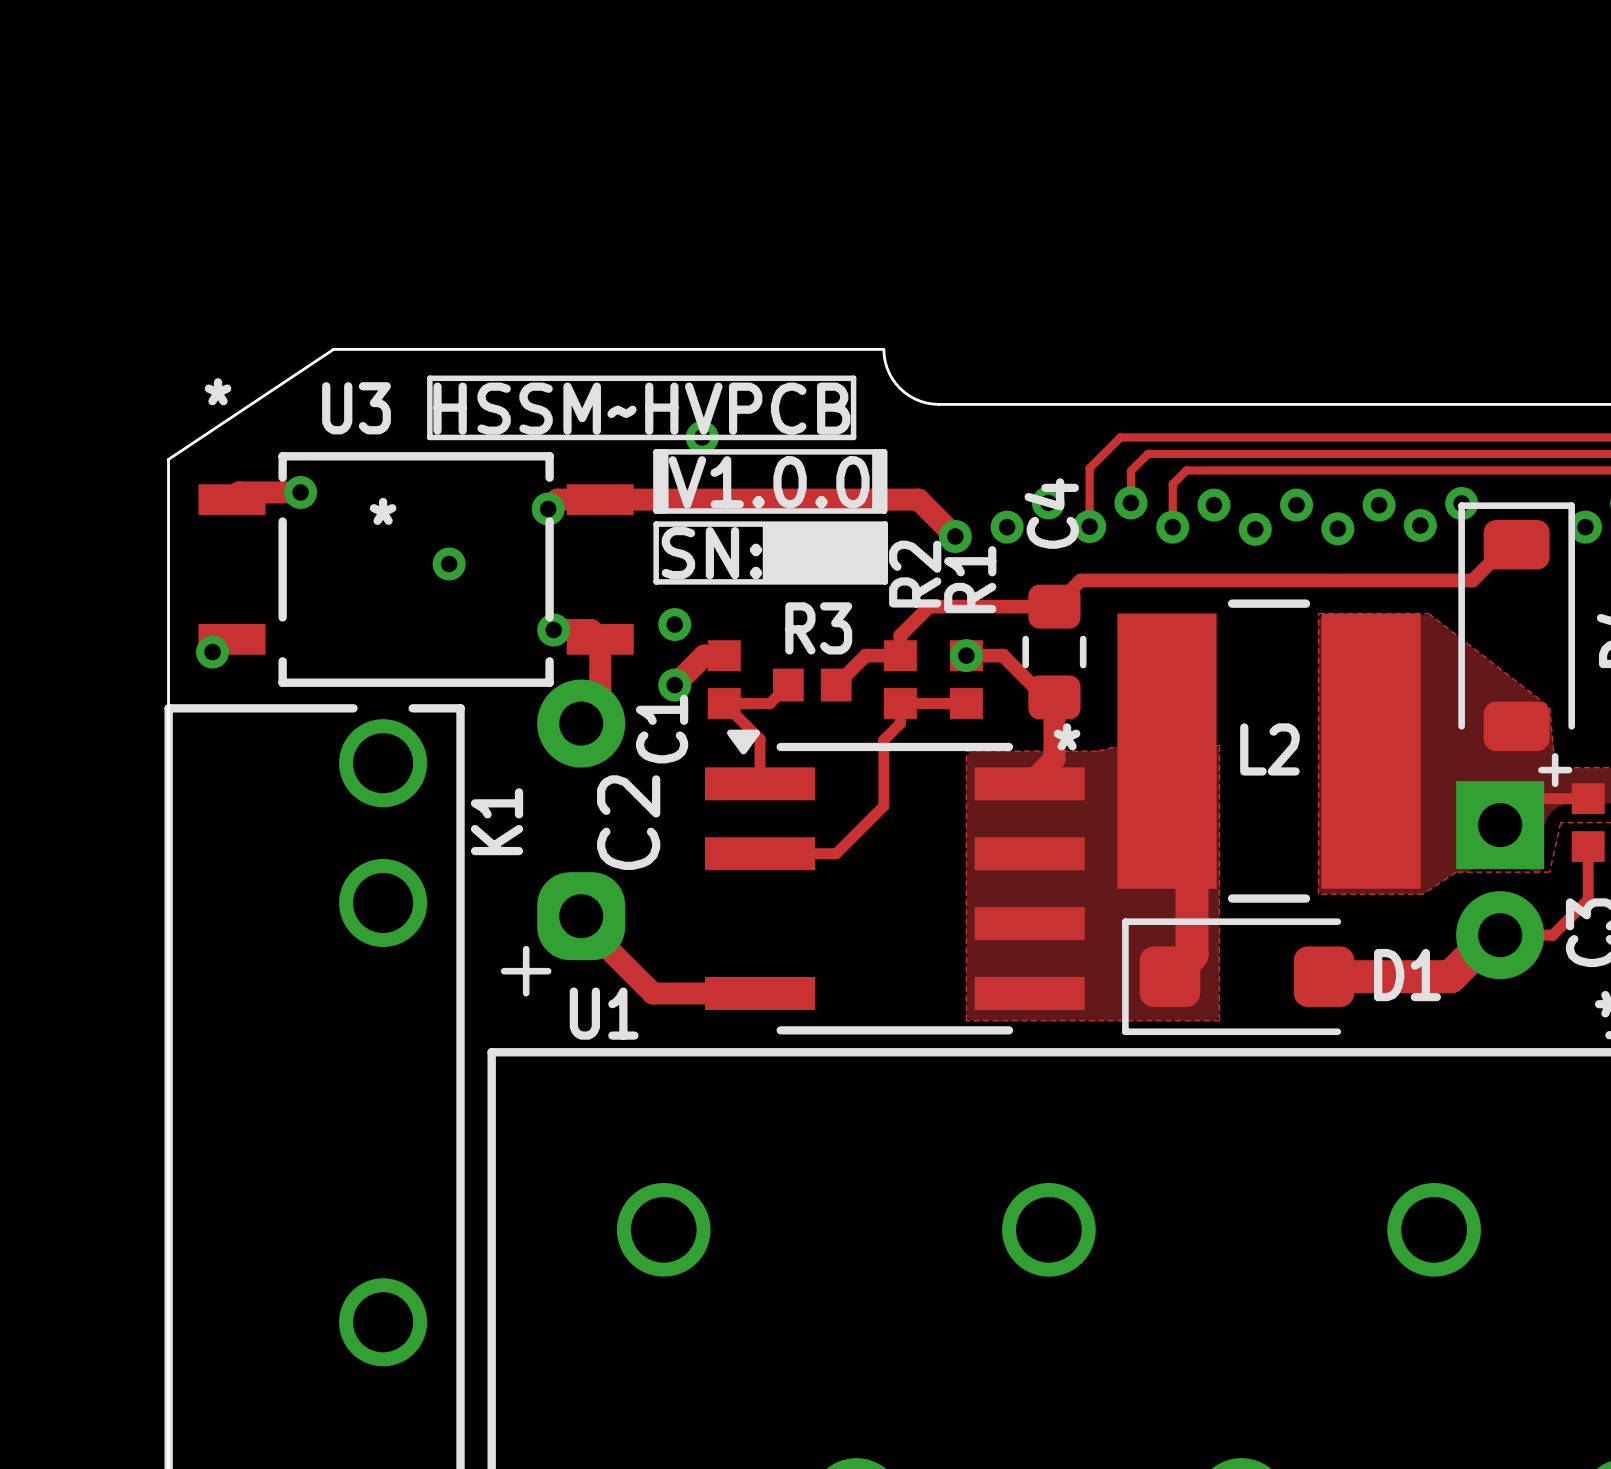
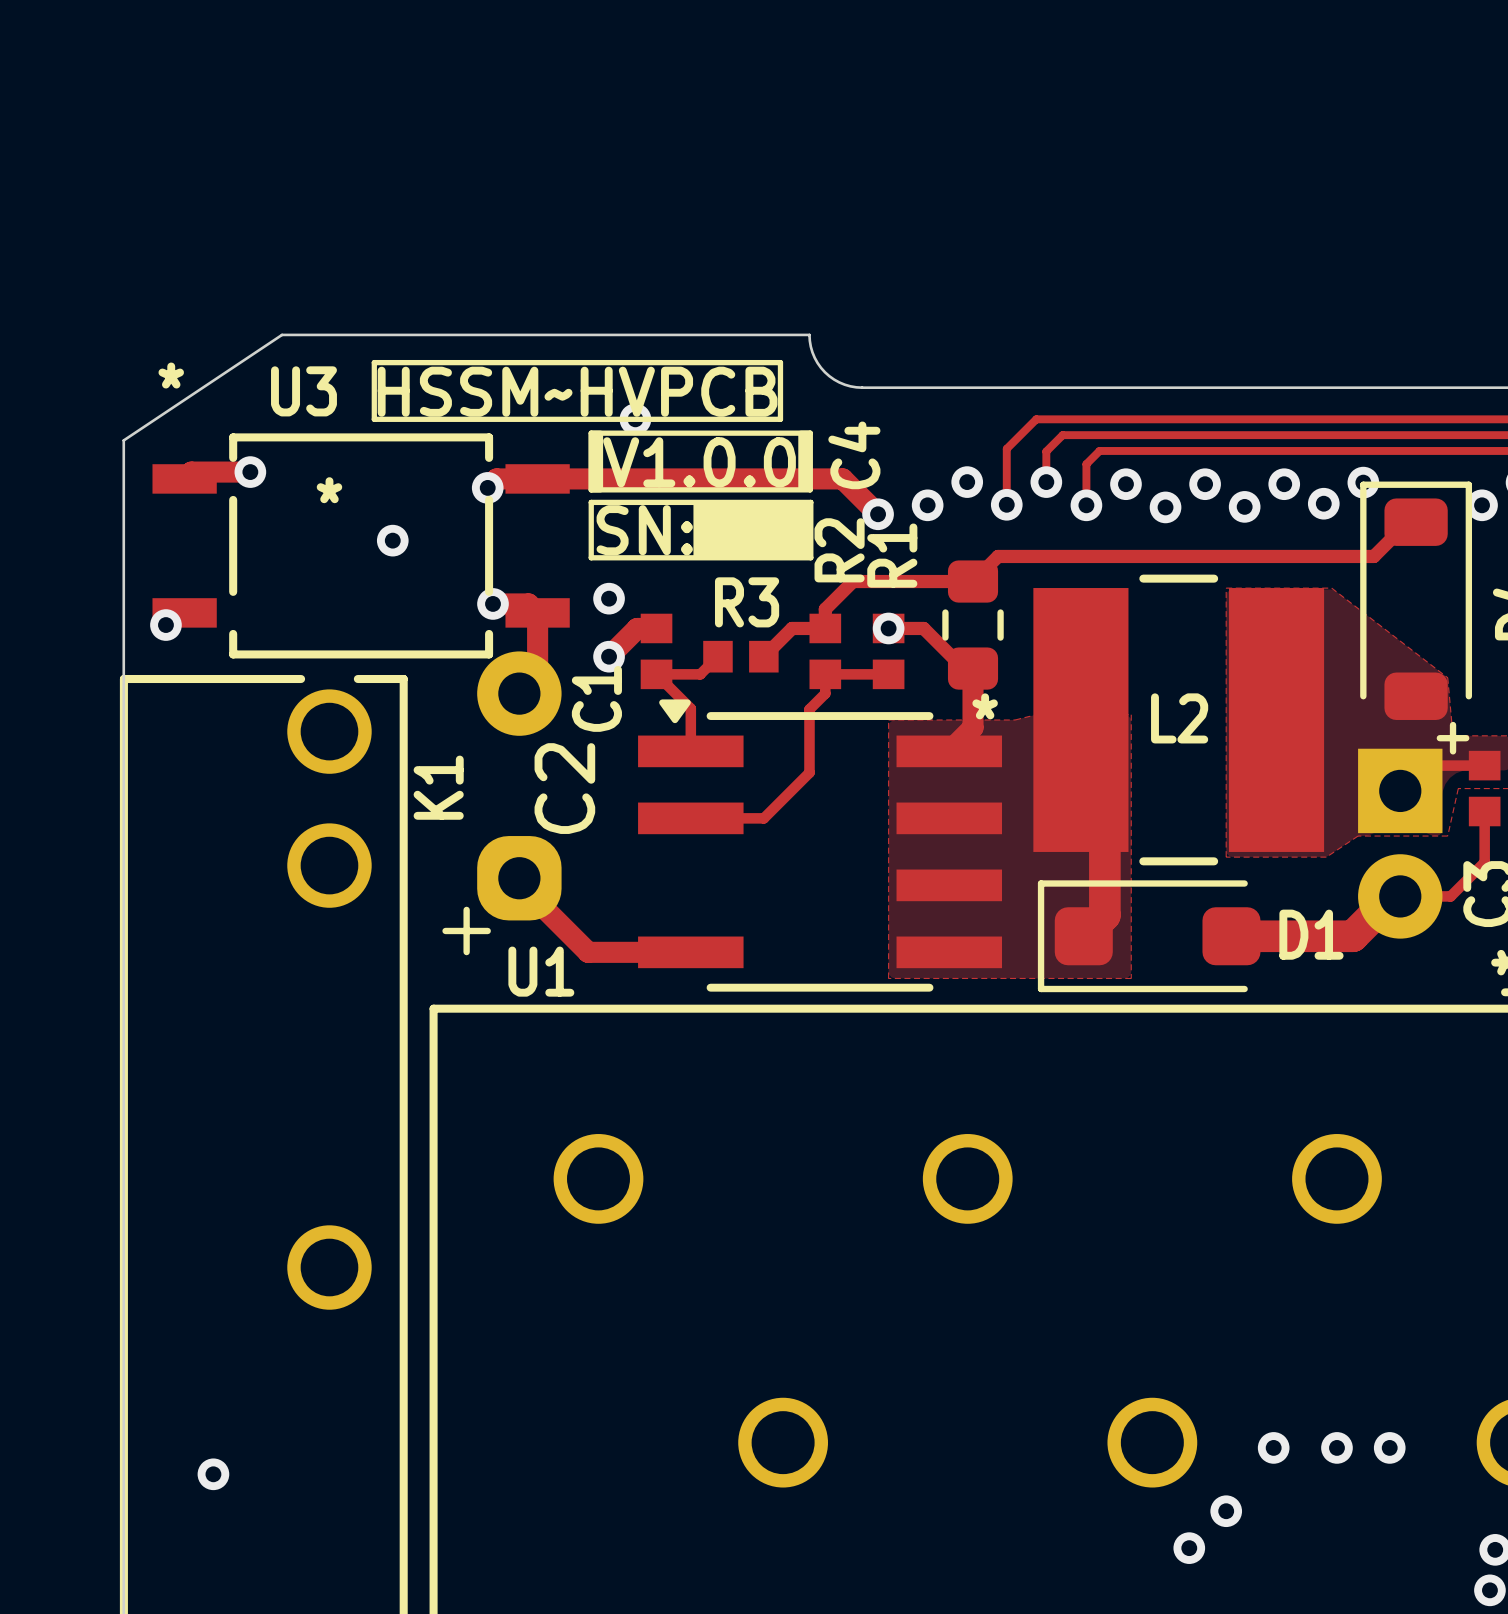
C4 name position: C4 (1051, 513) -> C4 (854, 455)

